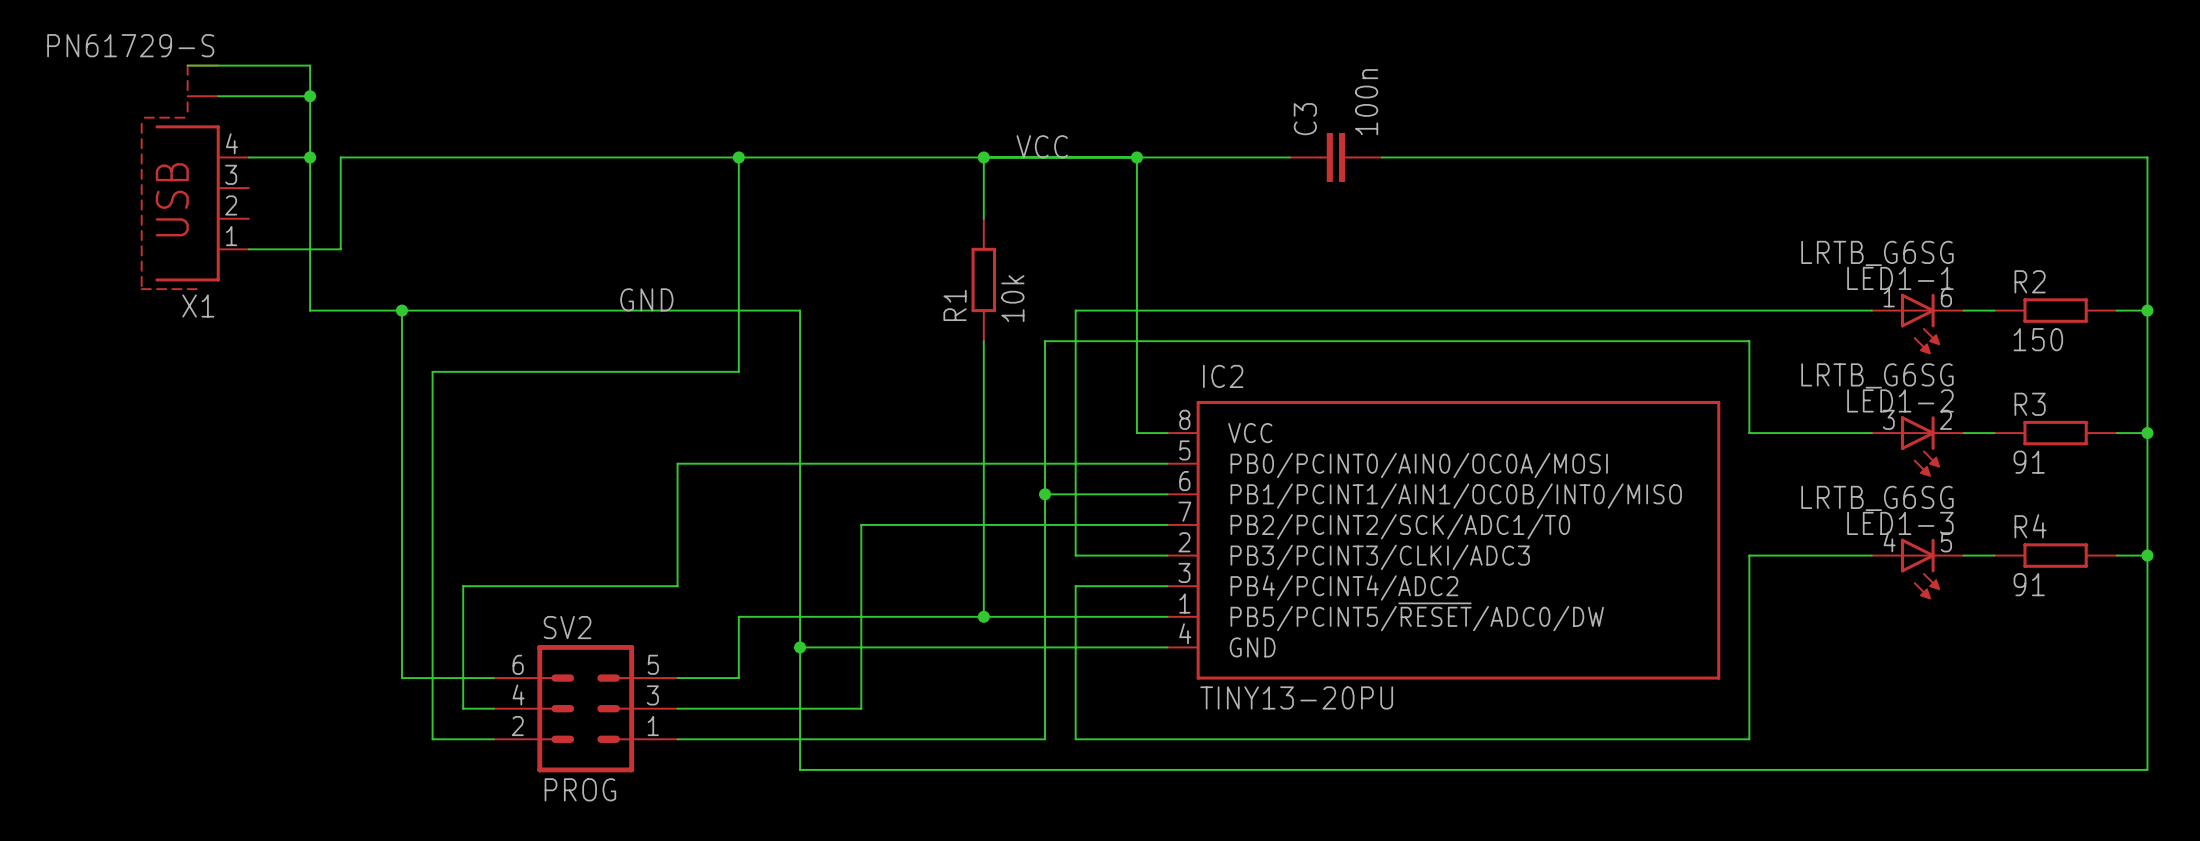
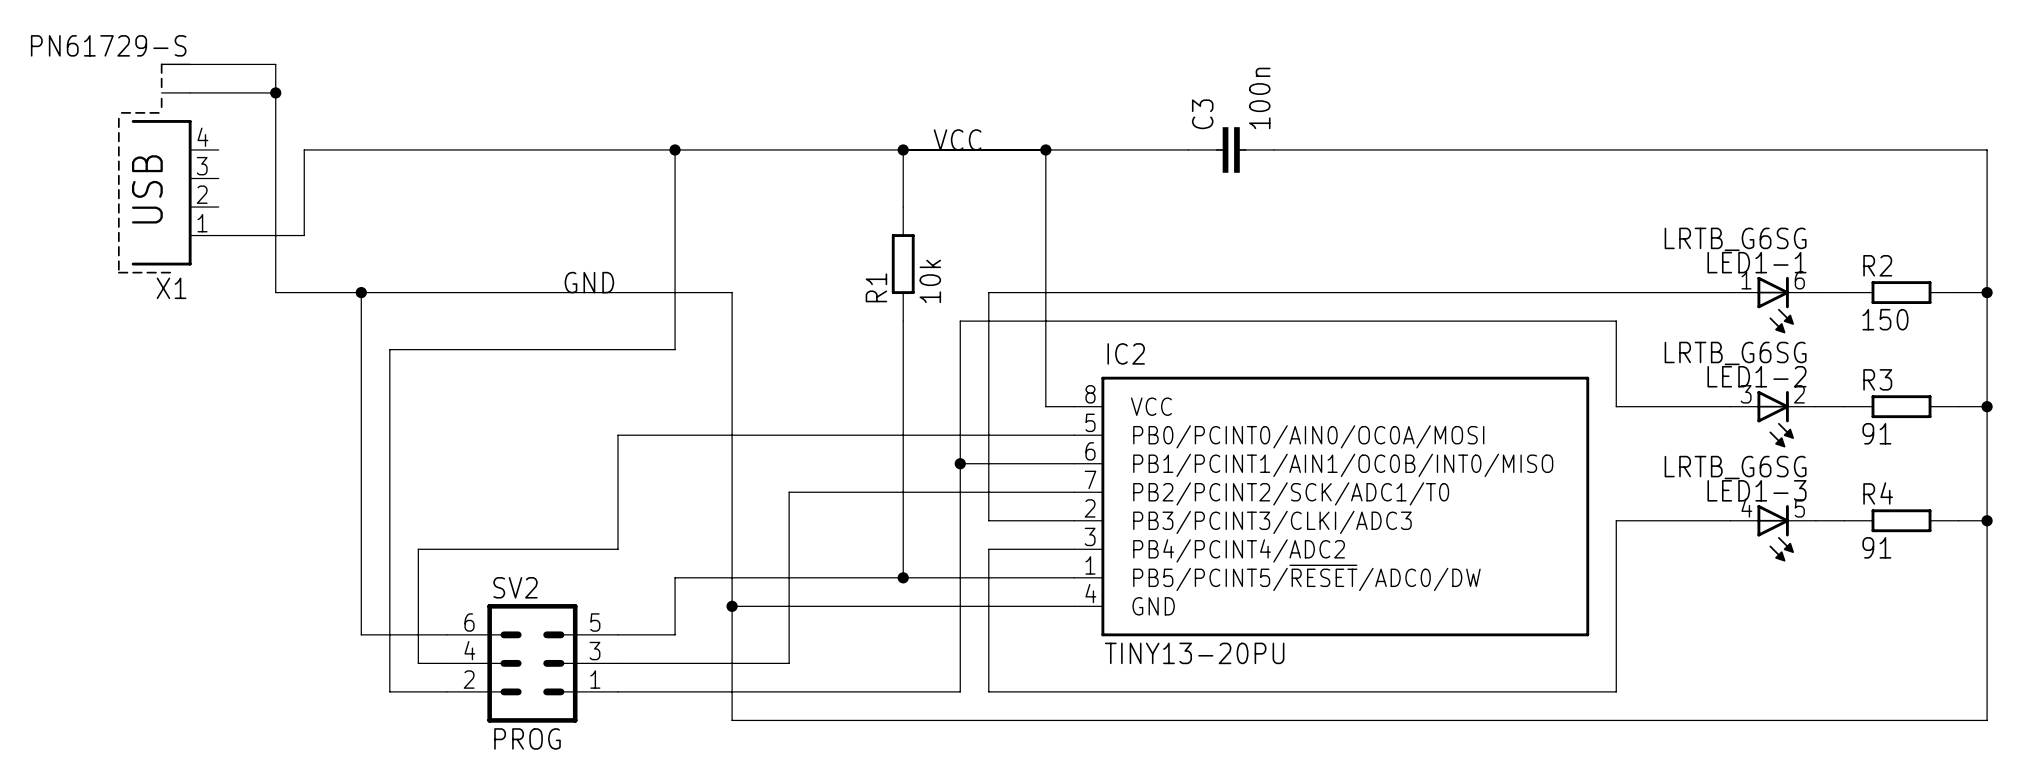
wire: (248, 157) (310, 157) -> none
junction: (310, 157) -> none

